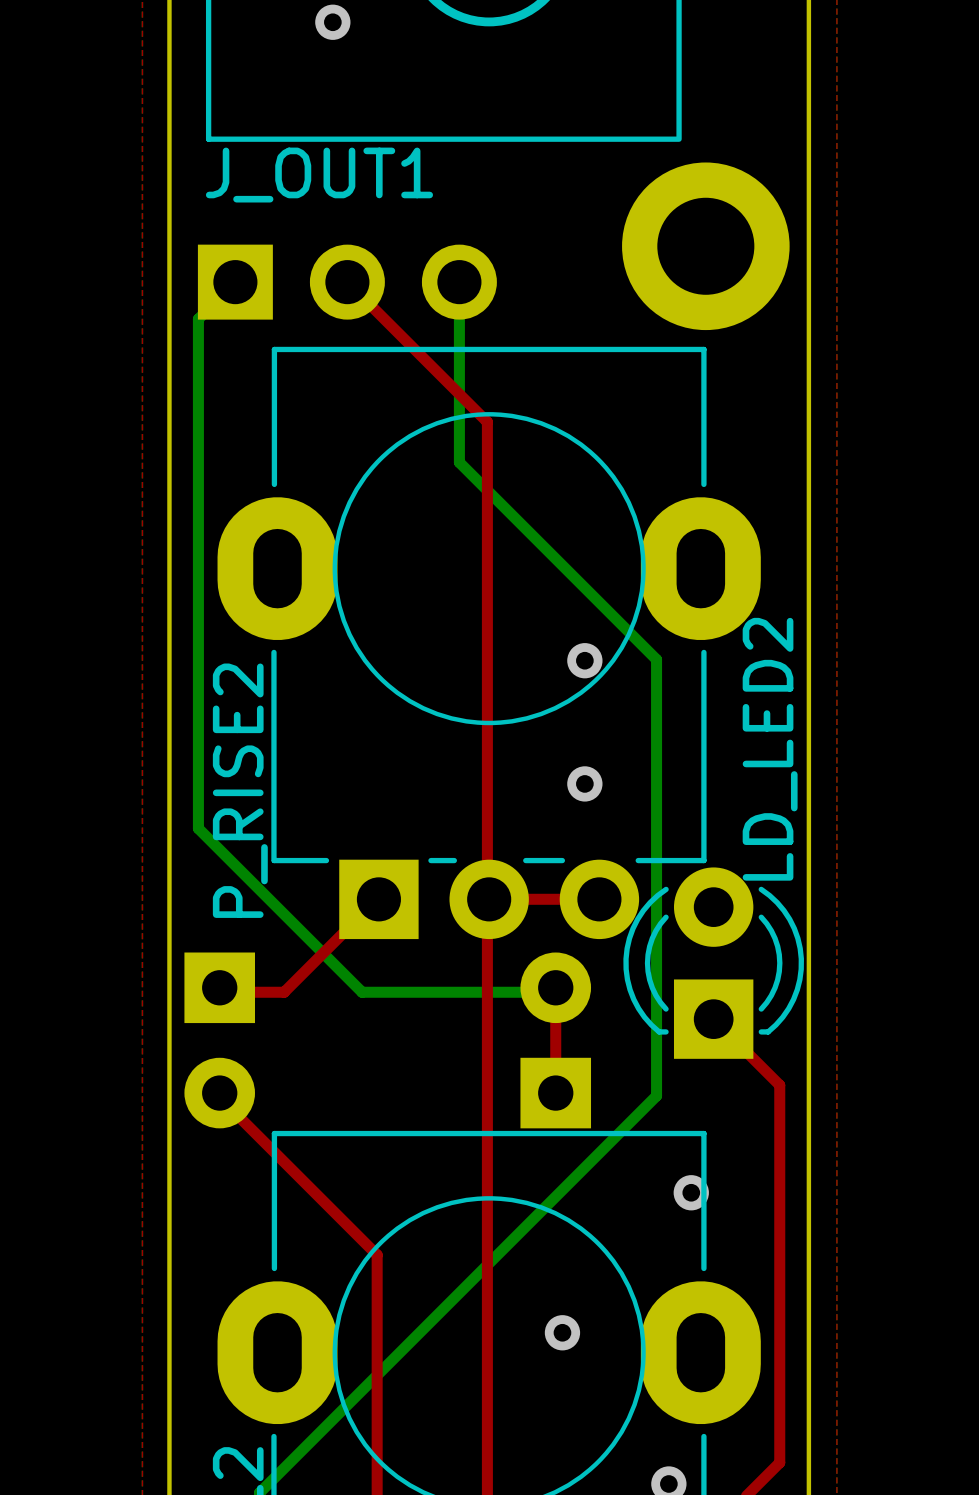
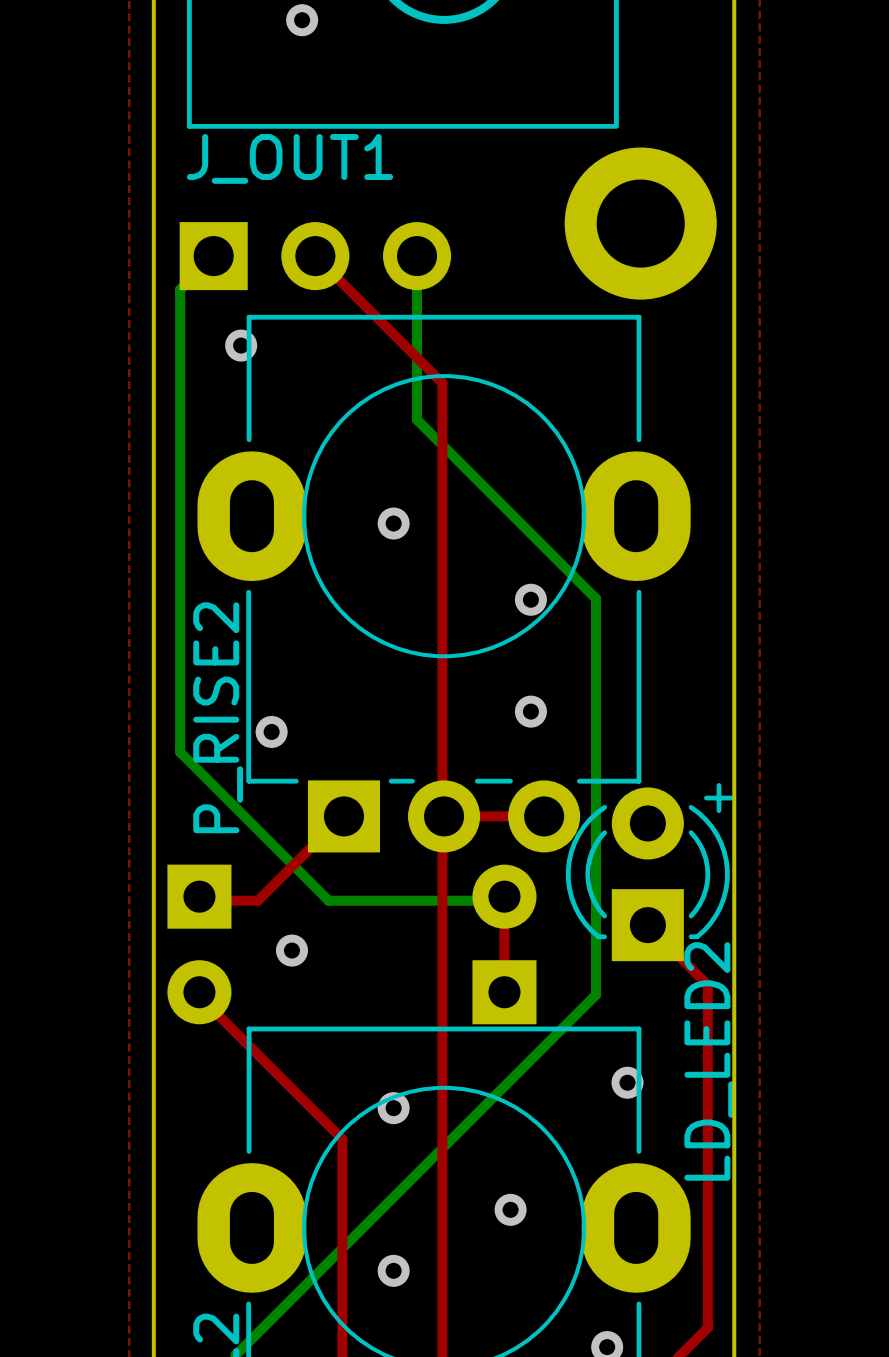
via: none -> (241, 345)
via: none -> (393, 523)
LD_LED2 name position: LD_LED2 (770, 749) -> LD_LED2 (709, 1061)
via: none -> (271, 731)
LD_LED2 footprint: [623, 867, 804, 1059] -> [565, 783, 735, 962]
via: none -> (291, 950)
via: none -> (393, 1108)
via: none -> (393, 1270)

